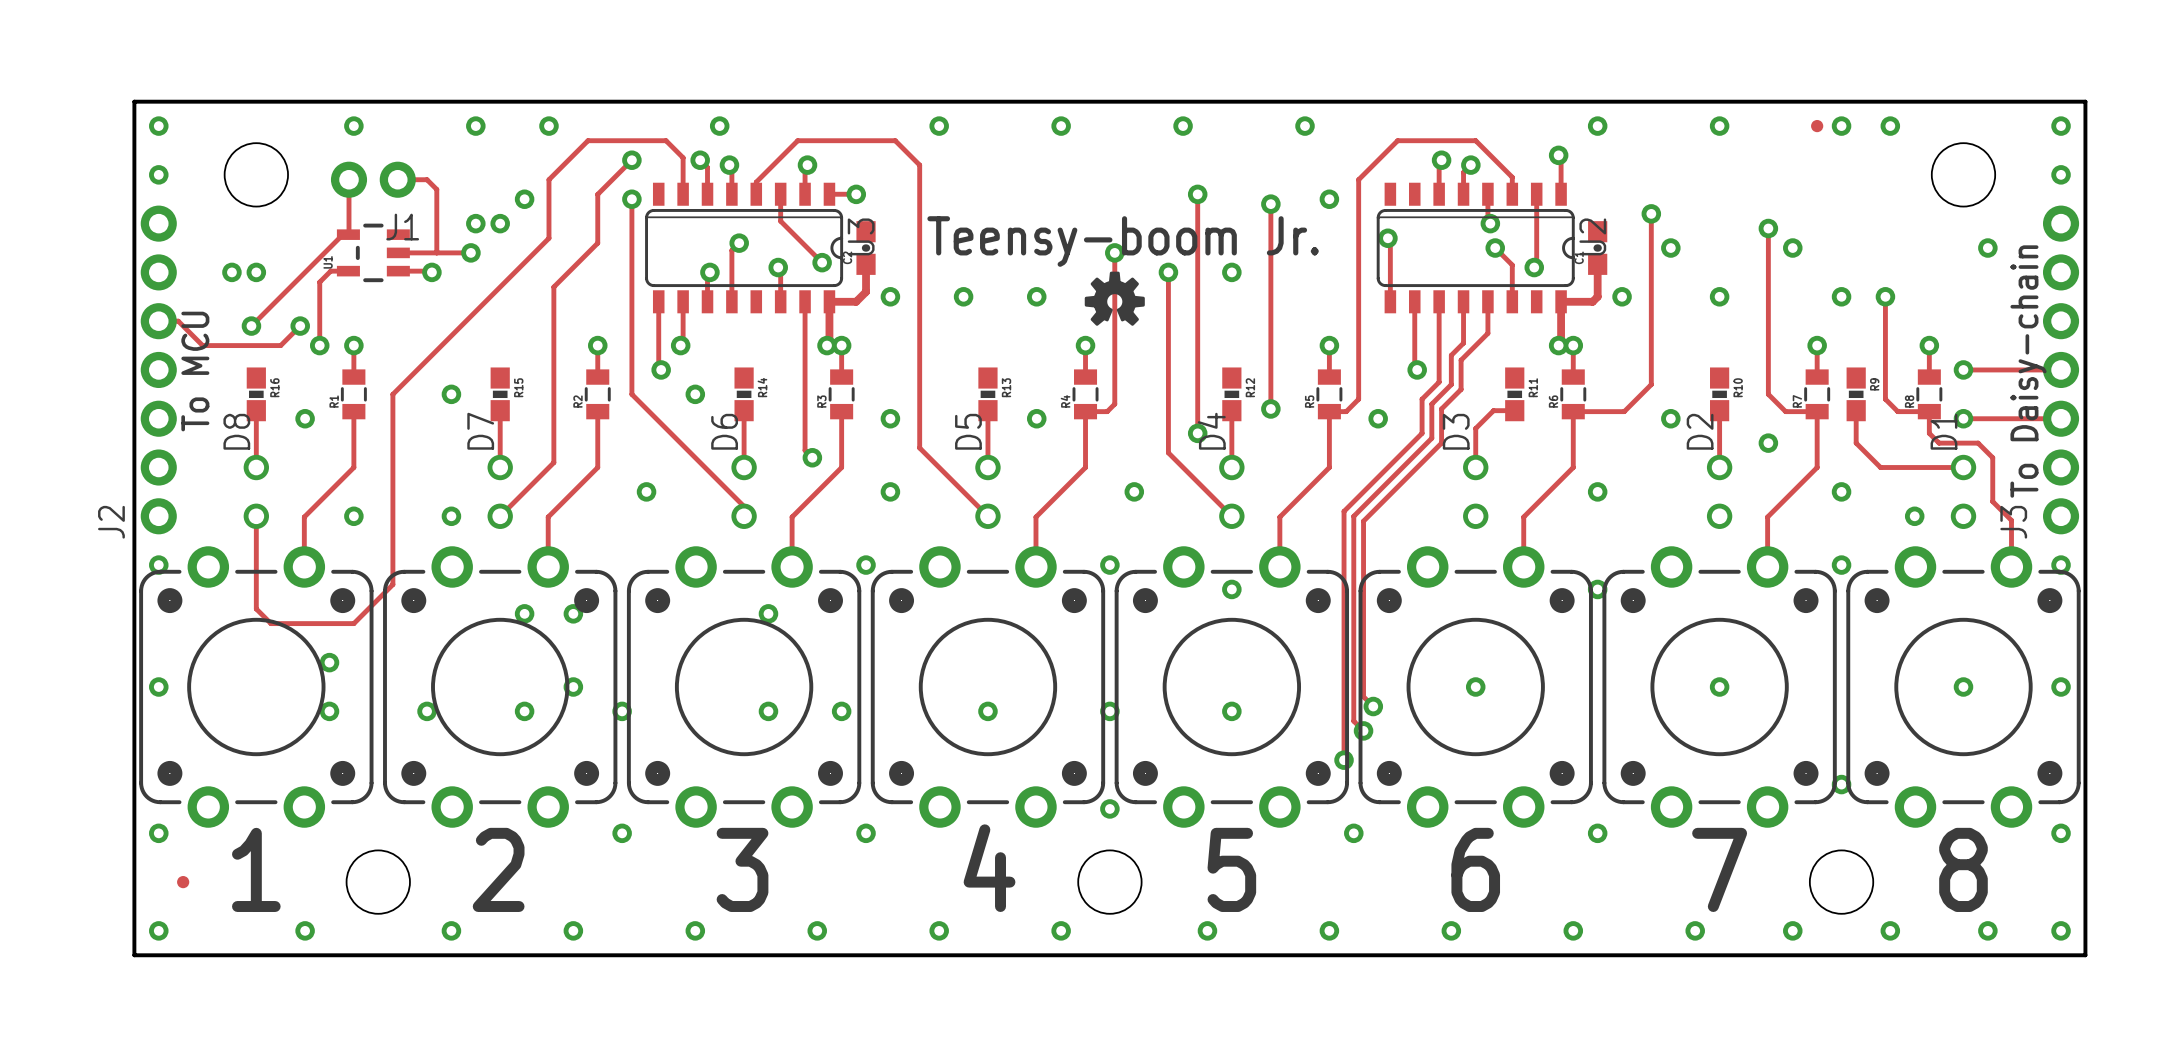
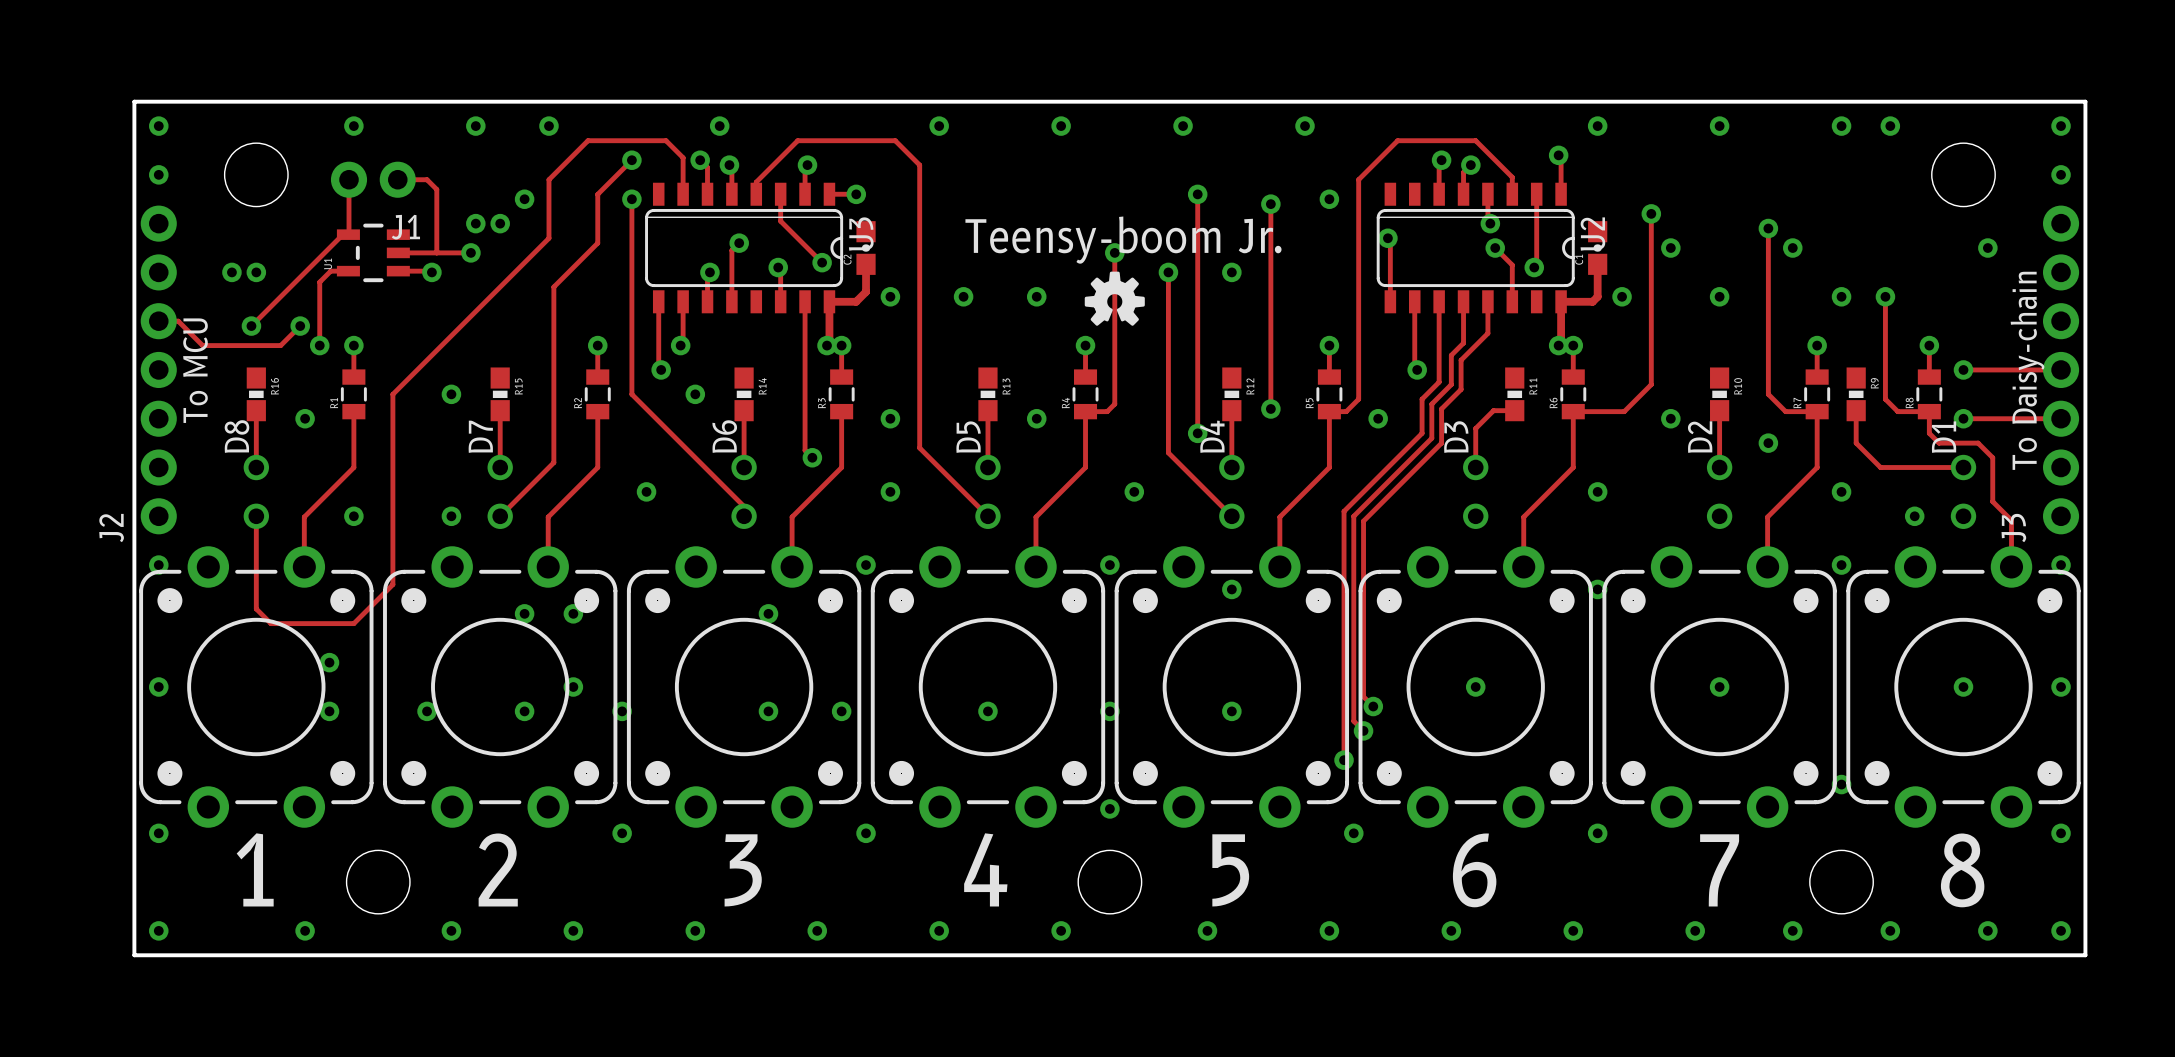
part: (1817, 126) -> none
part: (183, 882) -> none

